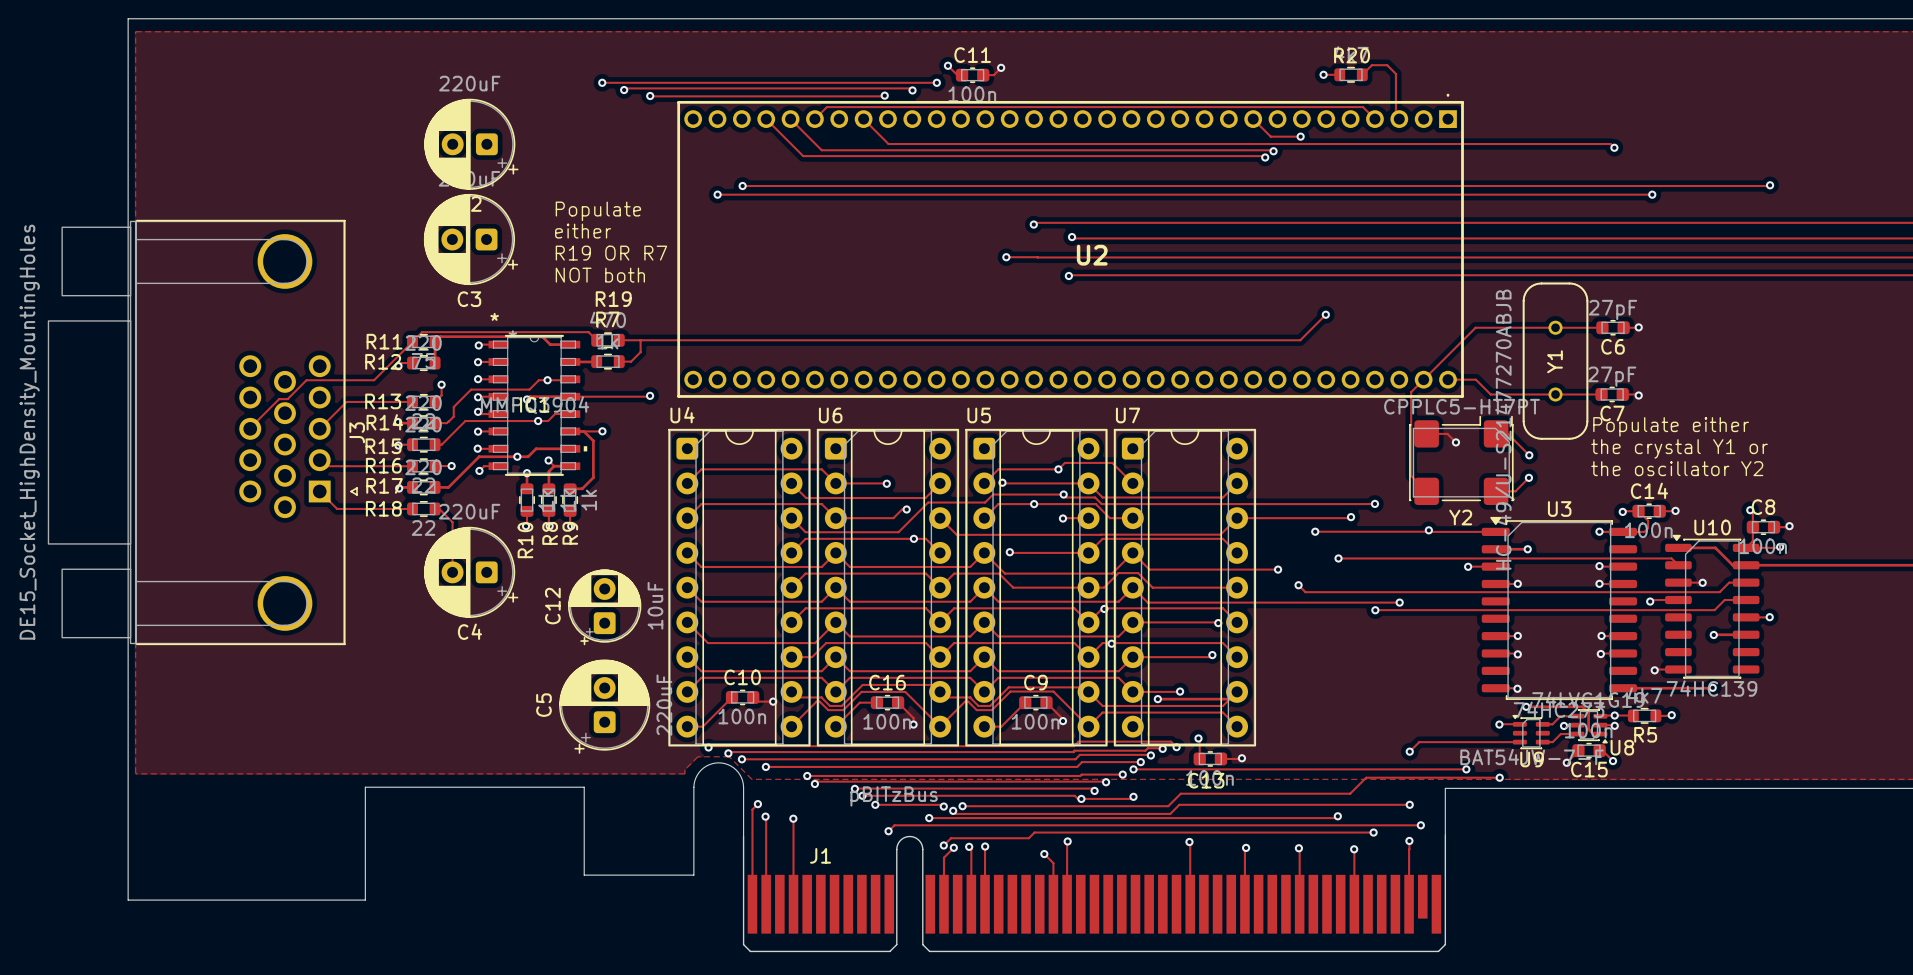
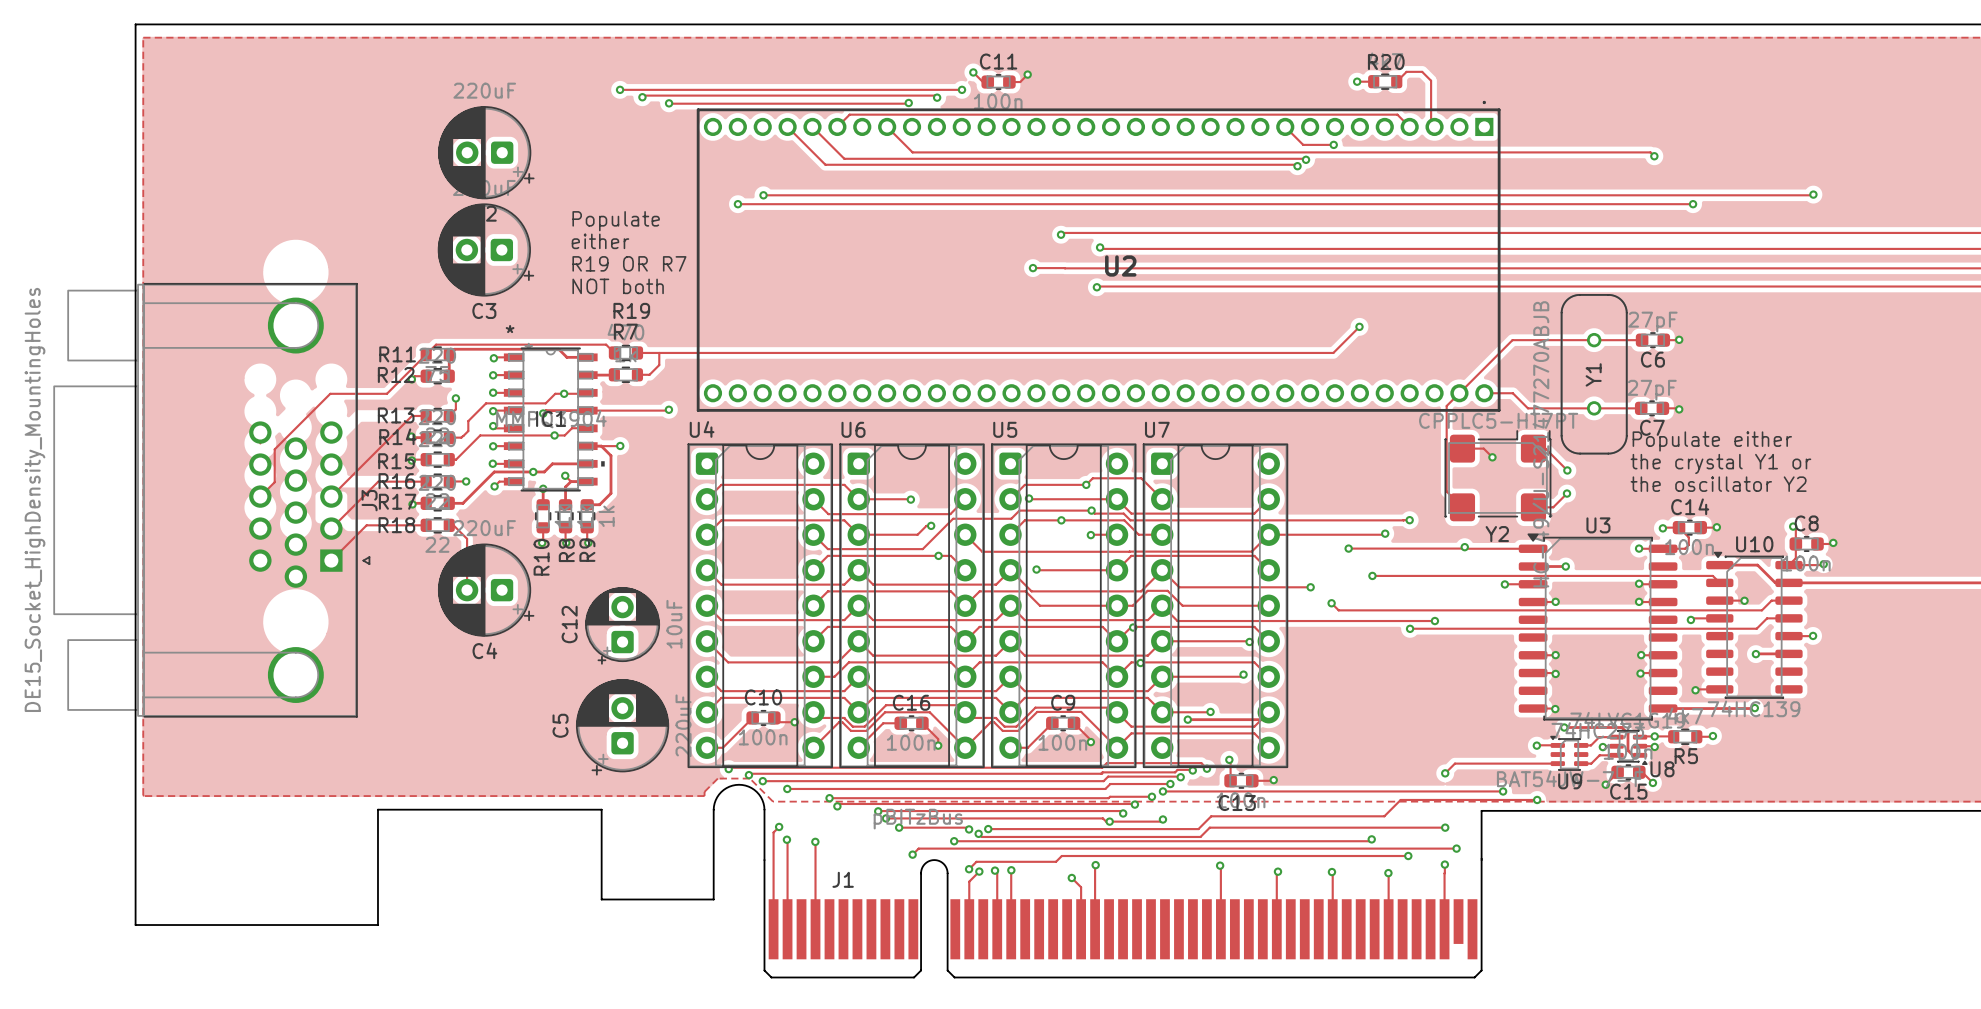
track: (318, 380) (306, 380) (287, 399) (279, 399) (250, 428) -> (330, 393) (274, 449) (274, 482) (260, 496)
track: (398, 401) (346, 401) (319, 428) -> (411, 415) (331, 496)
J3 position: (202, 432) -> (211, 500)
track: (319, 460) (325, 466) (365, 466) -> (331, 528) (378, 481)
track: (319, 491) (337, 508) (354, 508) -> (331, 560) (366, 525)

